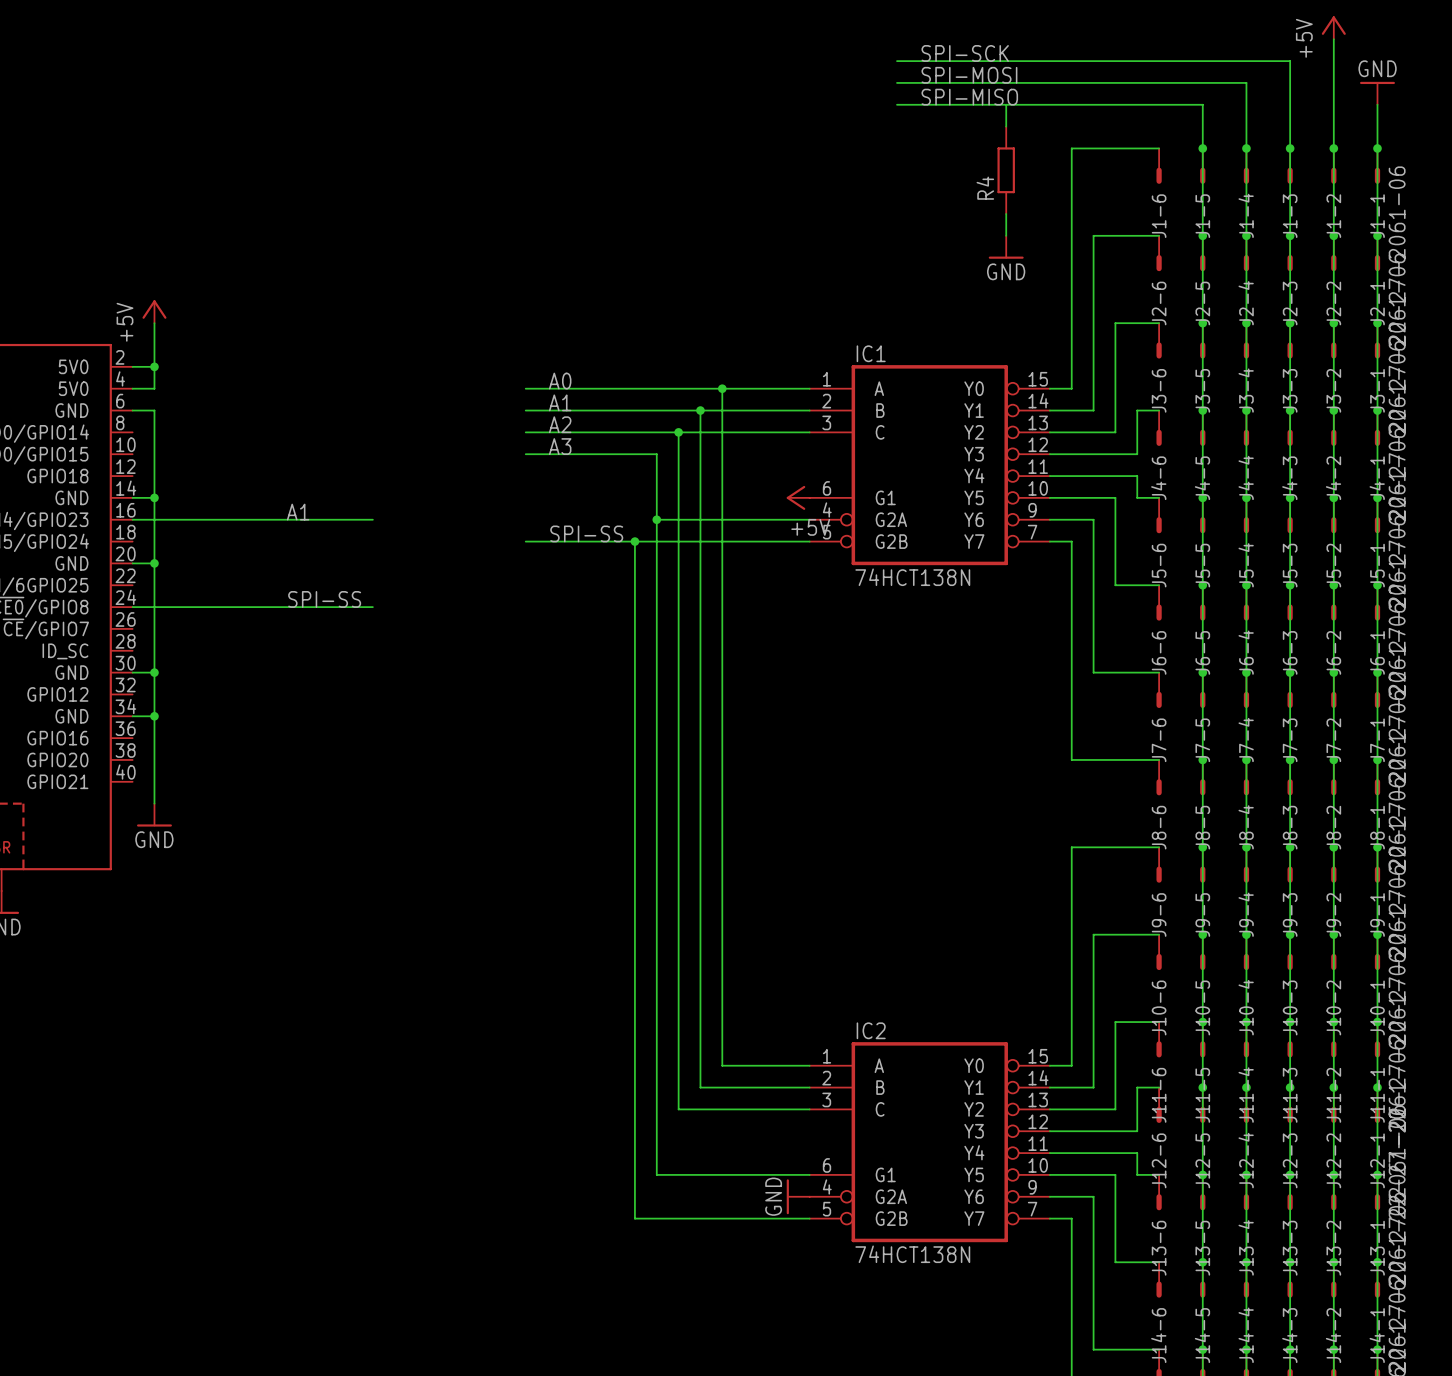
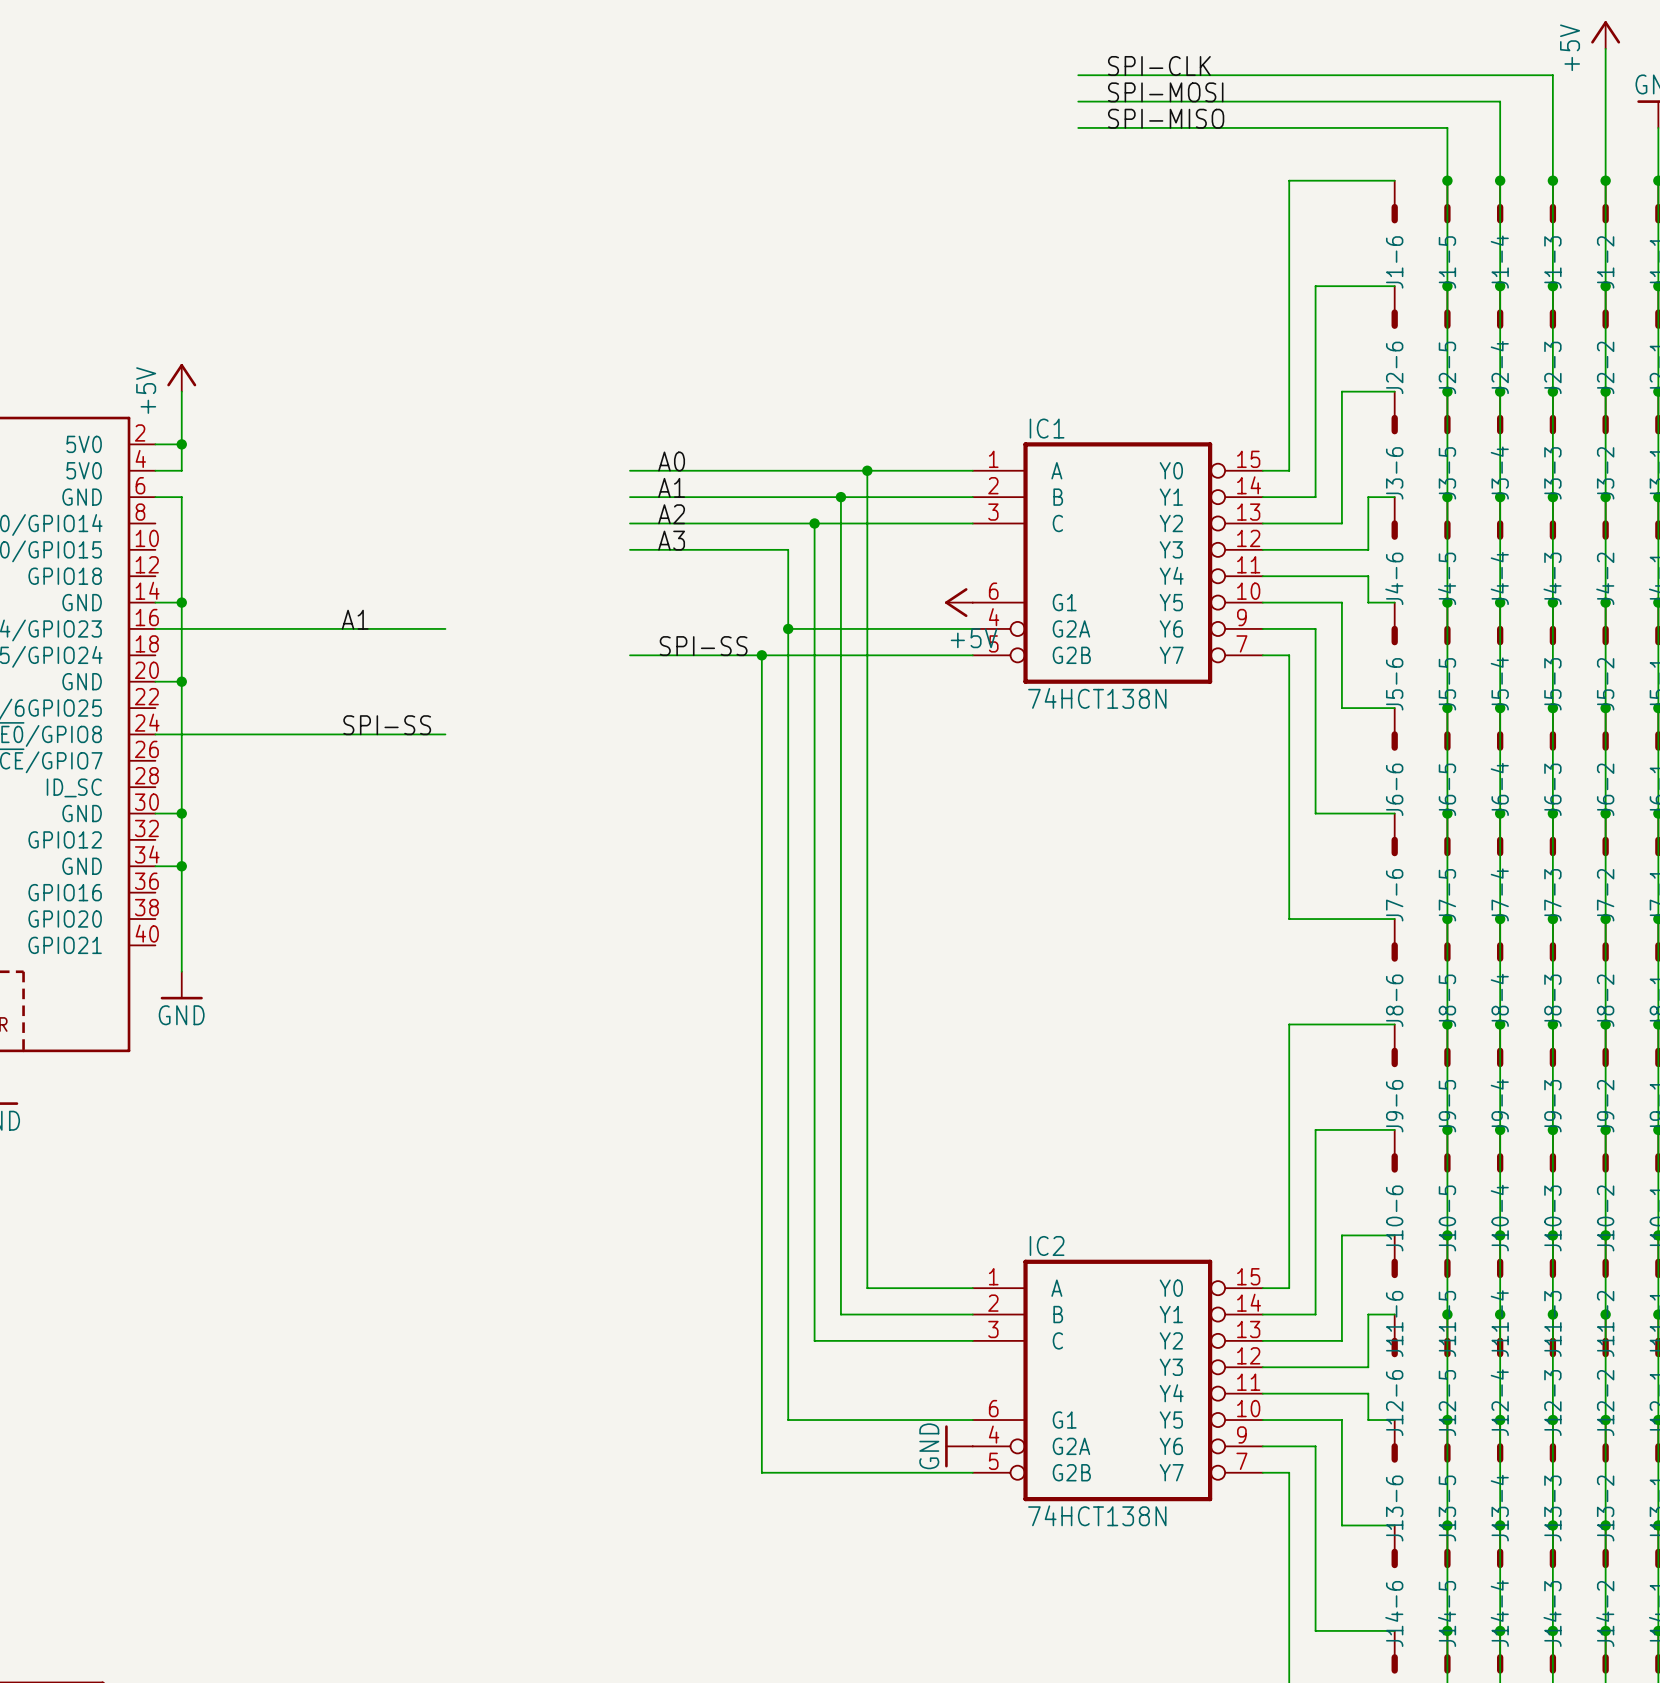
label: SPI-SCK (965, 53) -> SPI-CLK (1159, 66)
wire: (1006, 104) (1006, 126) -> none
R4: (1006, 170) -> none
wire: (1006, 213) (1006, 235) -> none
power symbol: GND (1006, 247) -> none

